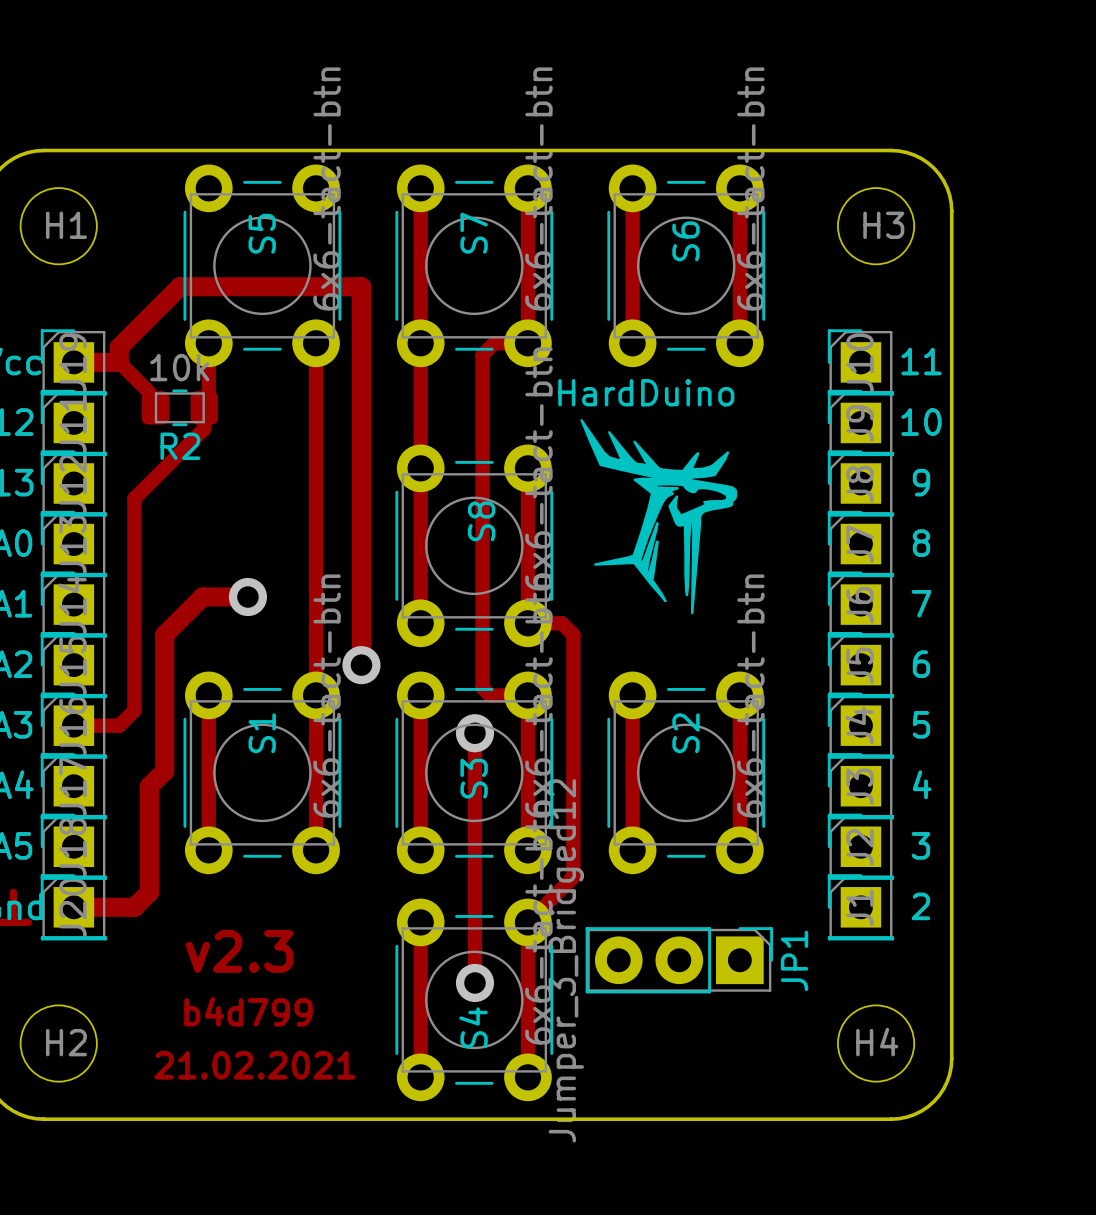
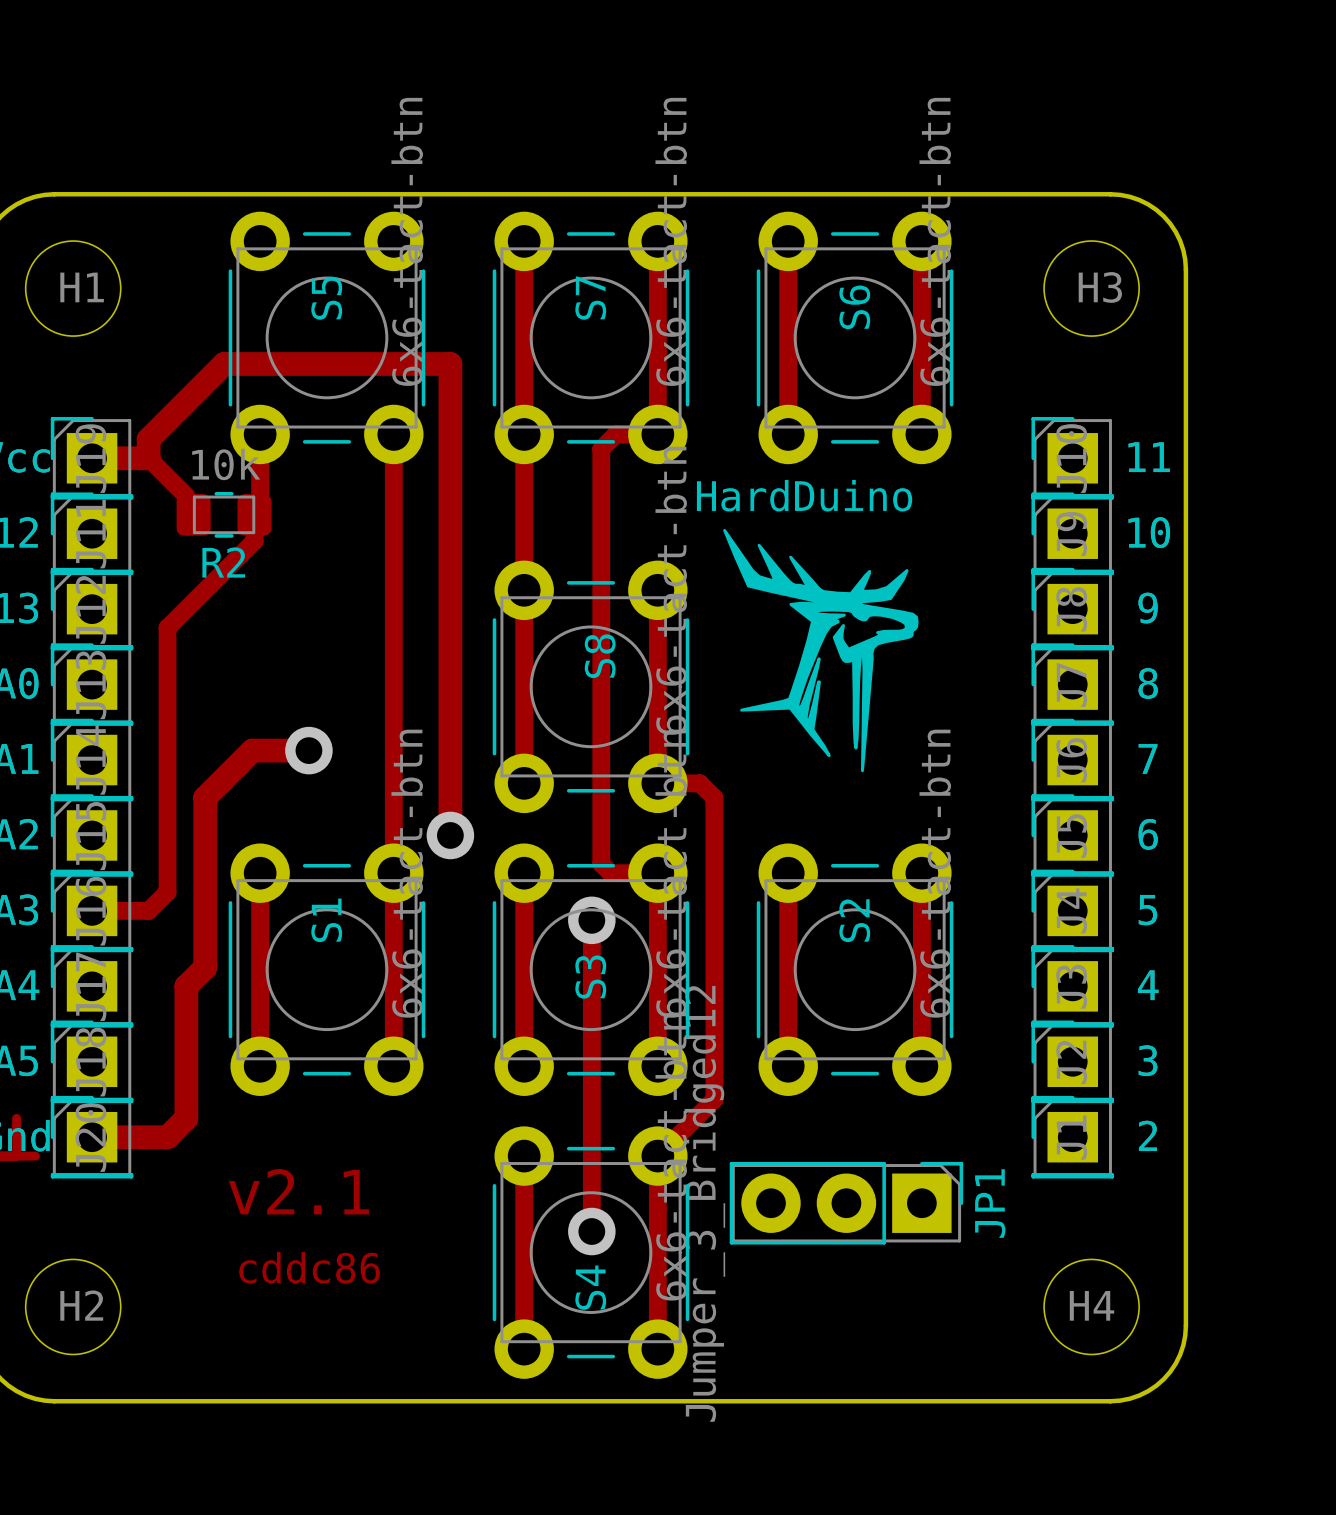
text: v2.3 (239, 951) -> v2.1 (298, 1191)
text: b4d799 (248, 1011) -> cddc86 (309, 1267)
text: 21.02.2021 (254, 1065) -> none

